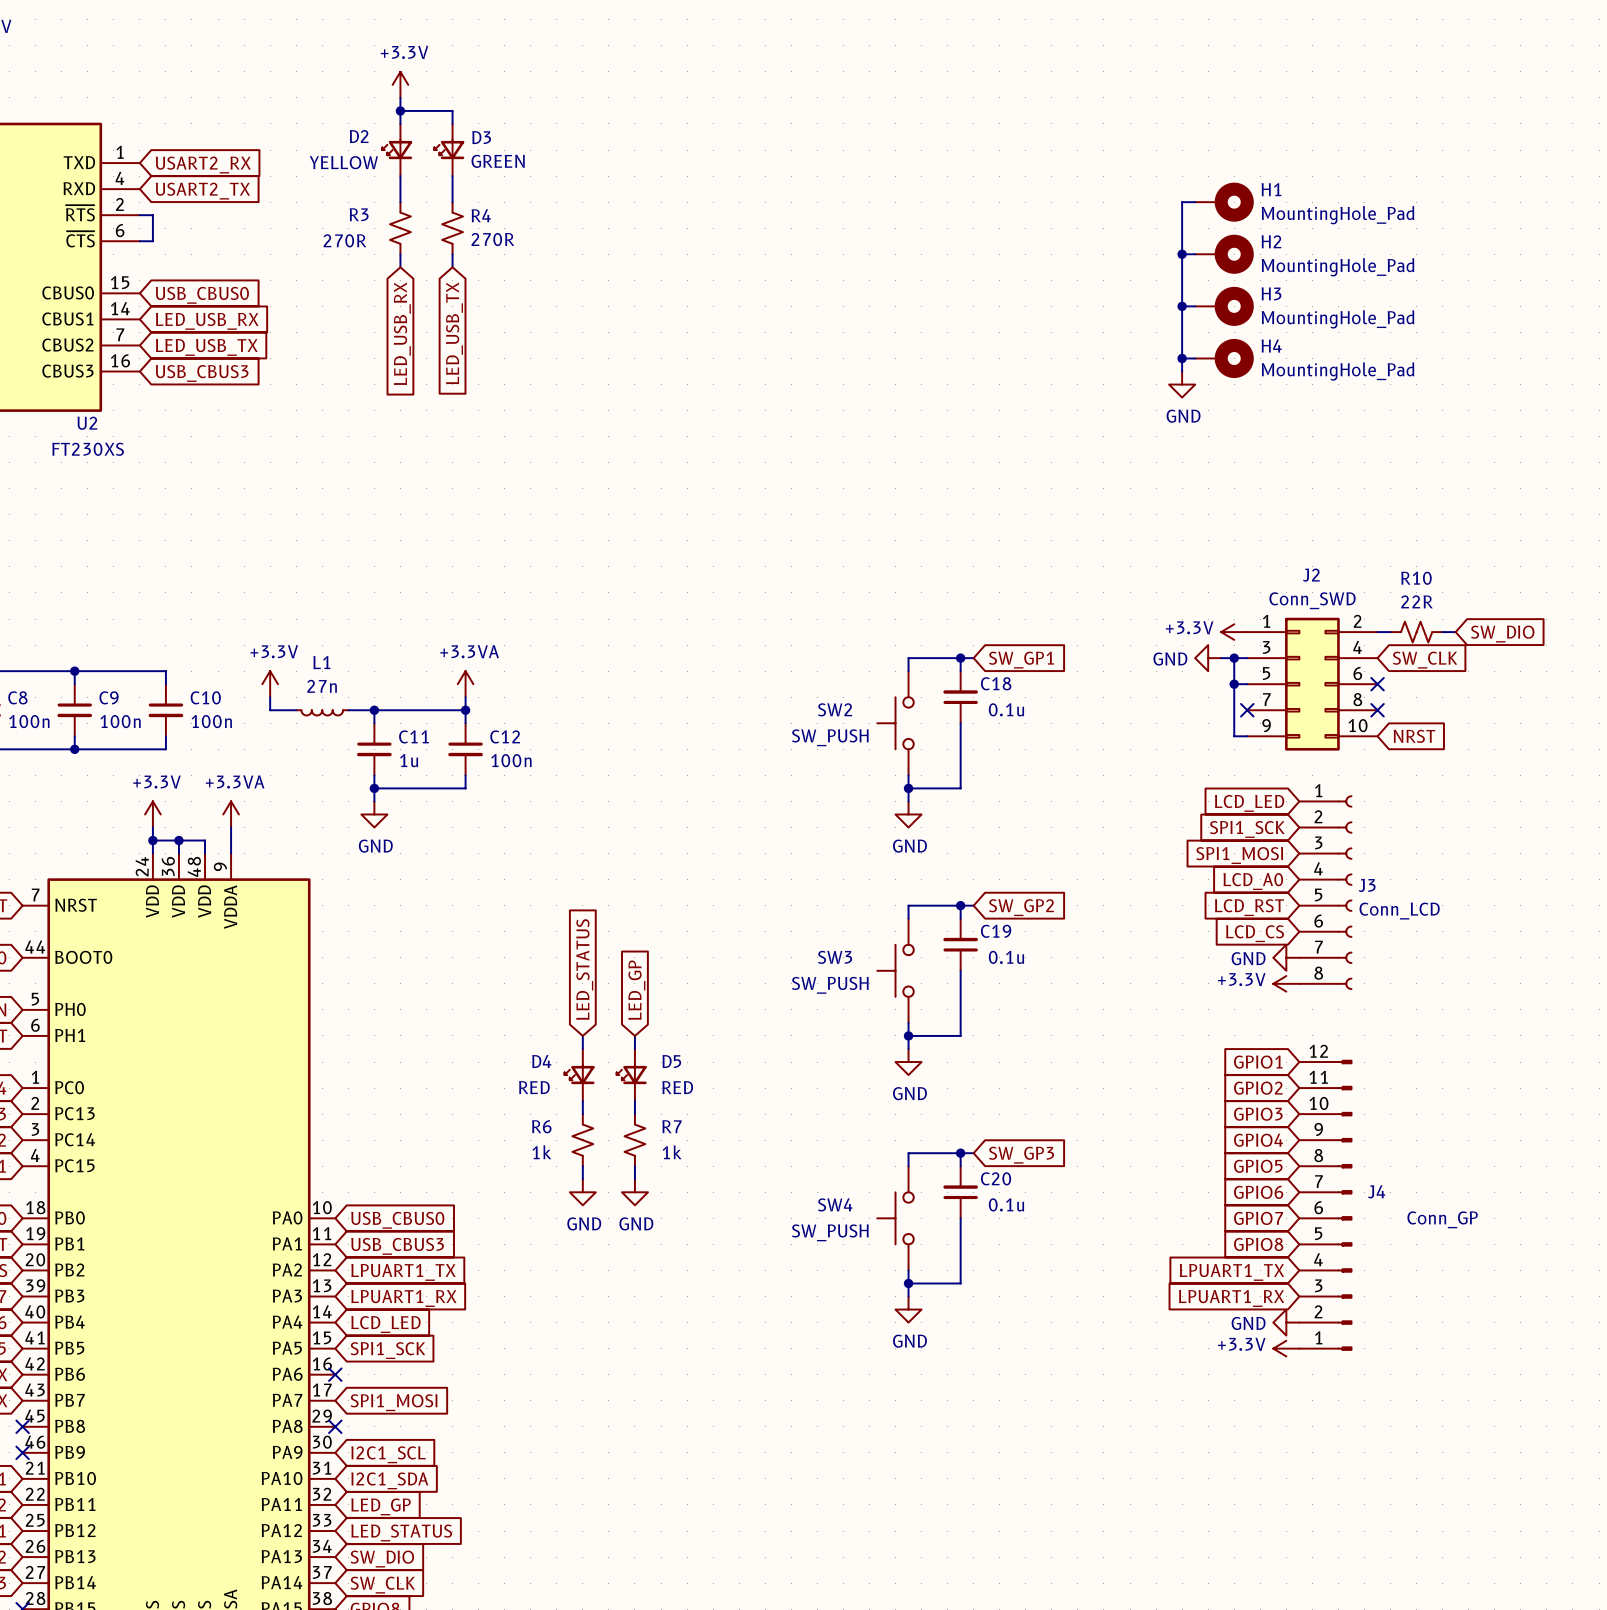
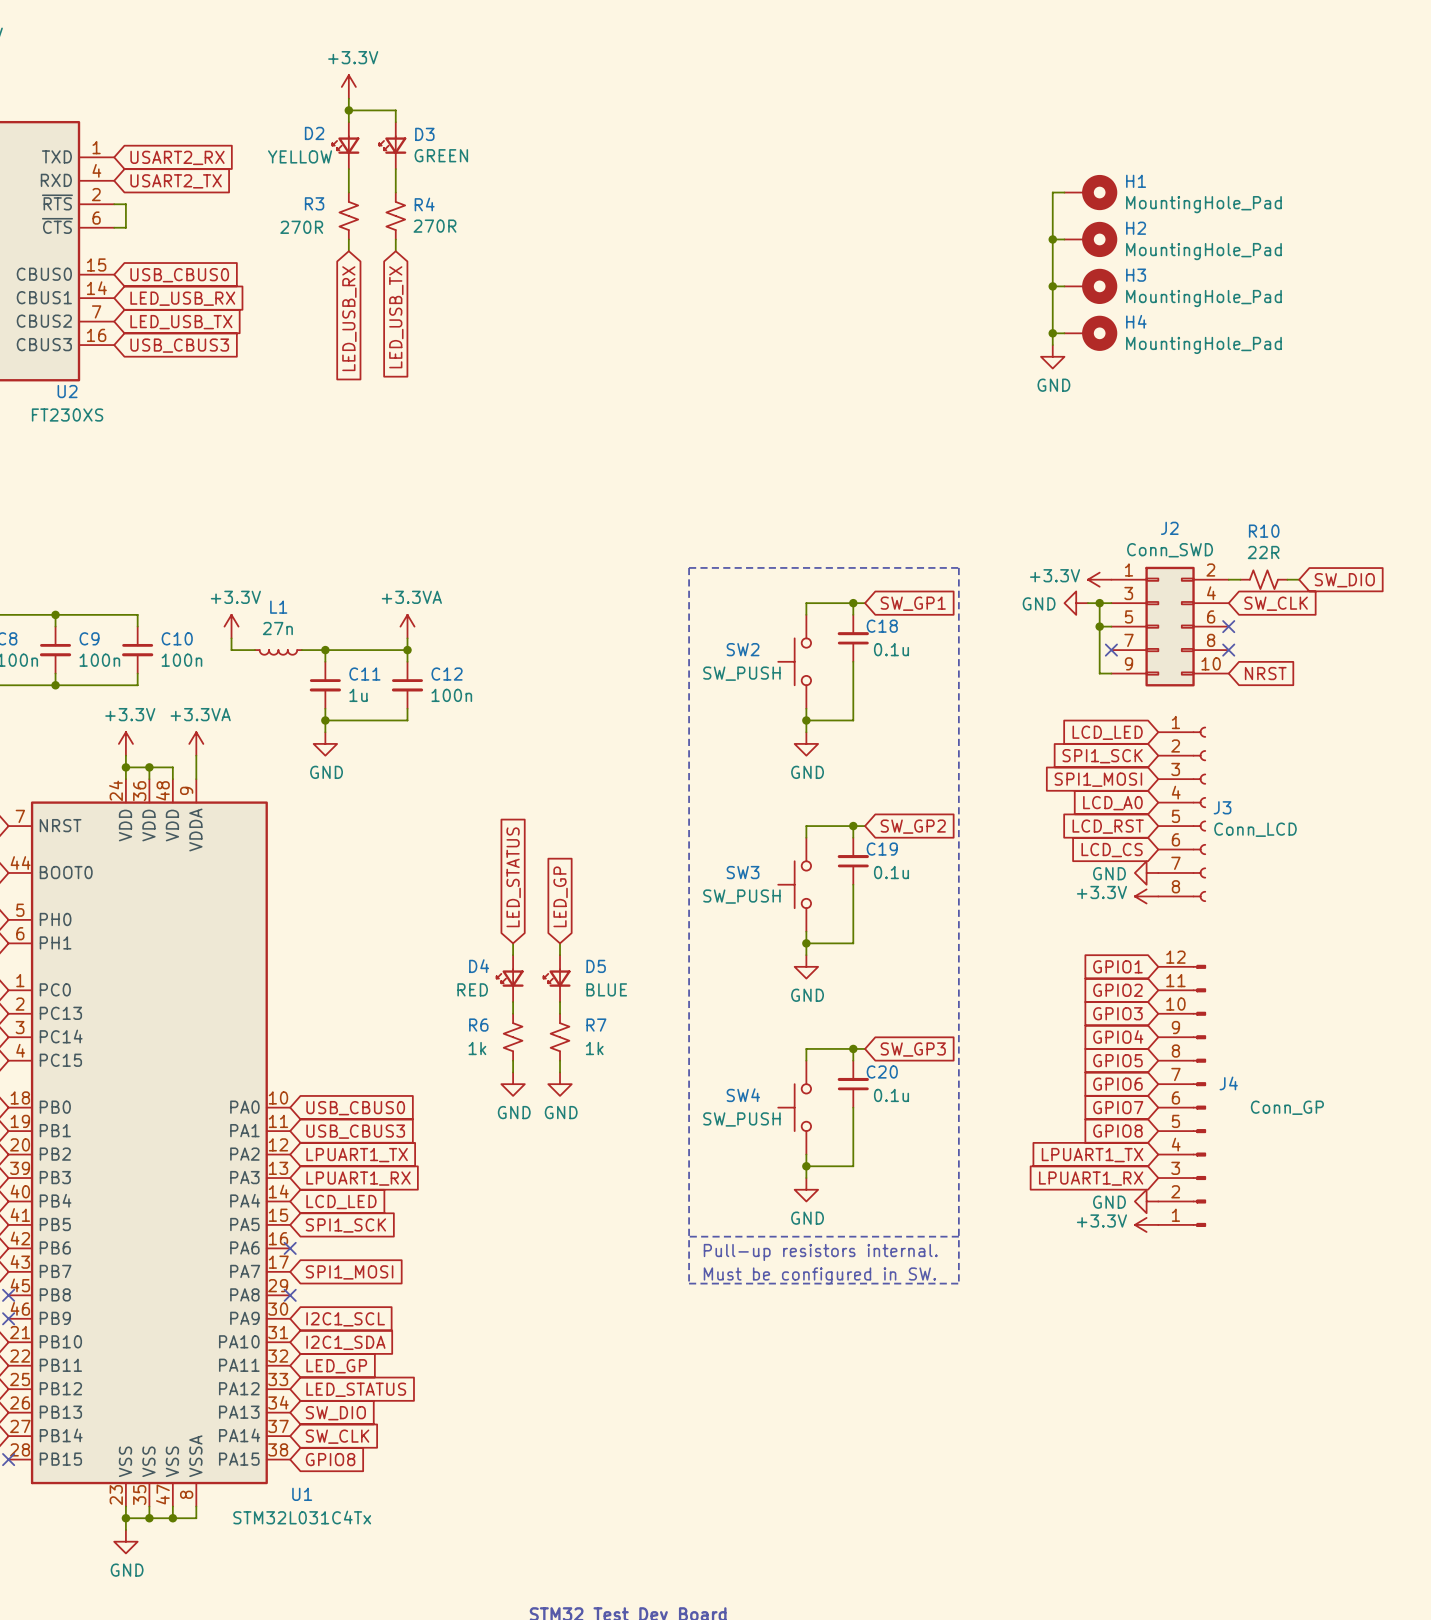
line: none -> (689, 567) (958, 567) (958, 1283) (689, 1283) (689, 567)
D5 value: RED (677, 1087) -> BLUE (606, 989)
line: none -> (689, 1236) (958, 1236)
text: none -> Pull-up resistors internal. (820, 1252)
text: none -> Must be configured in SW. (819, 1275)

